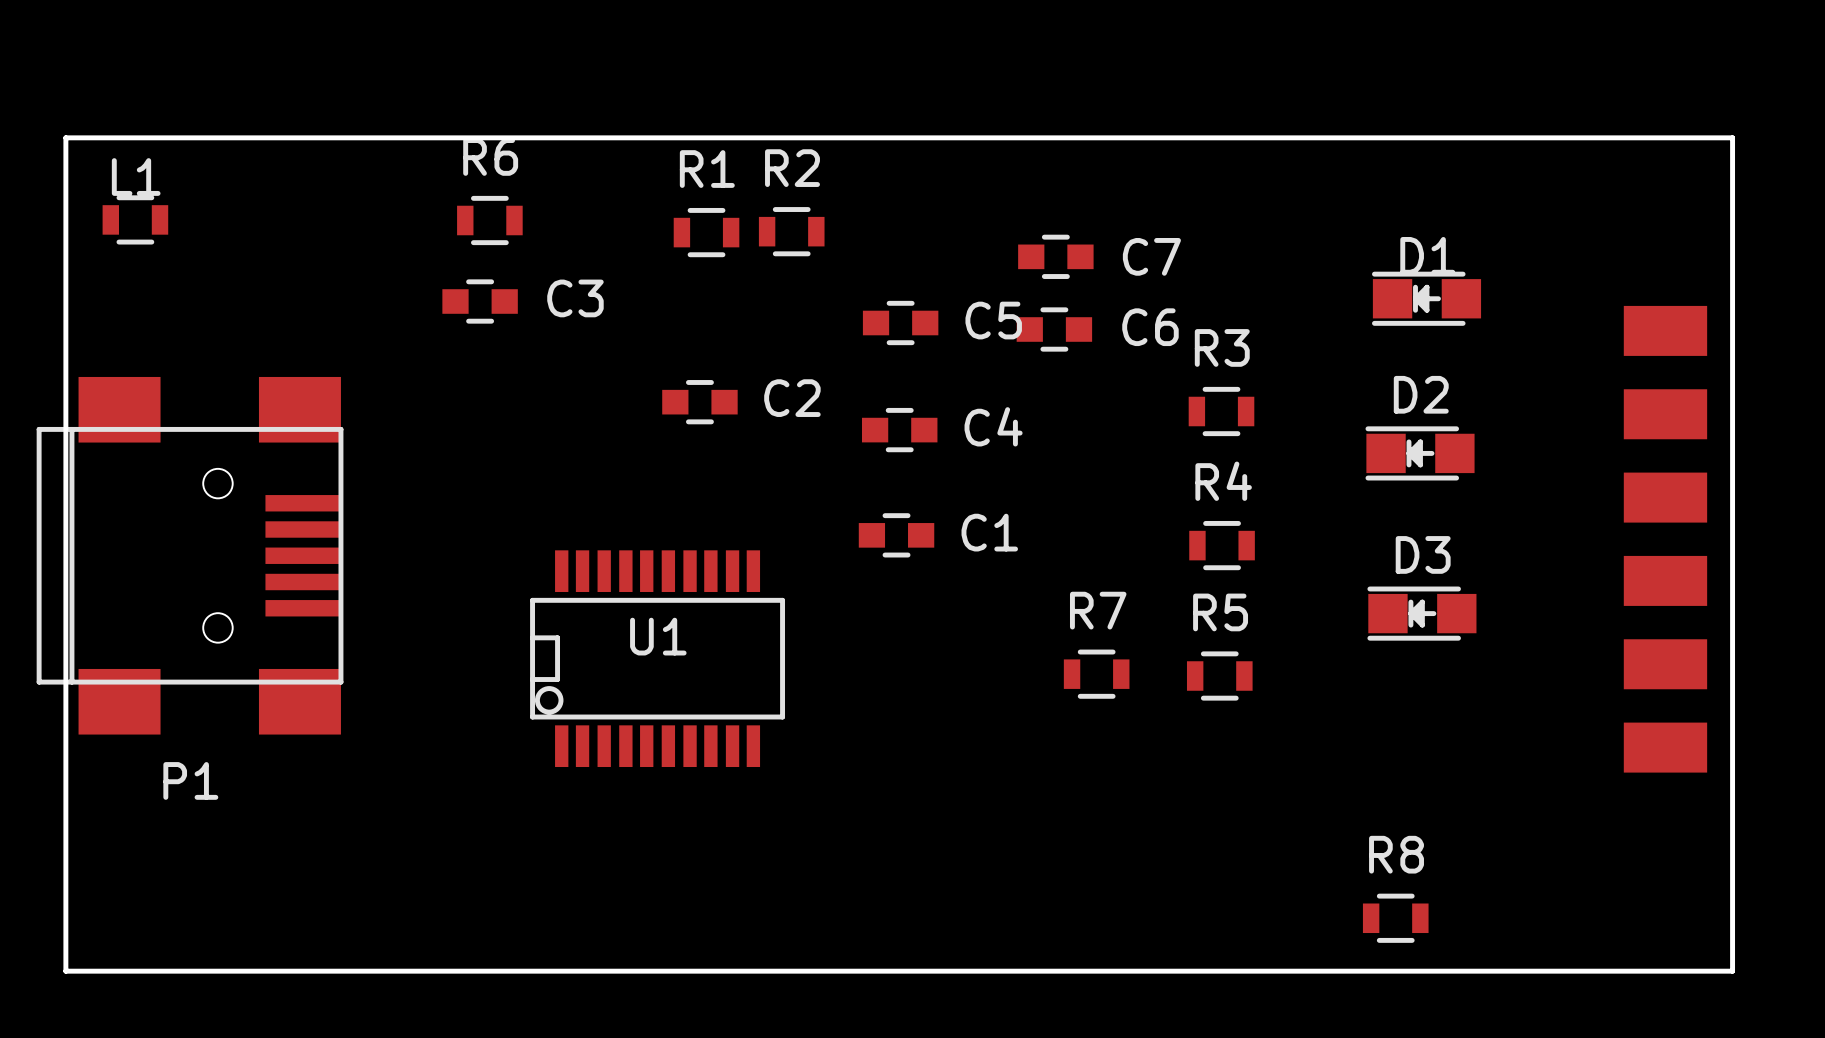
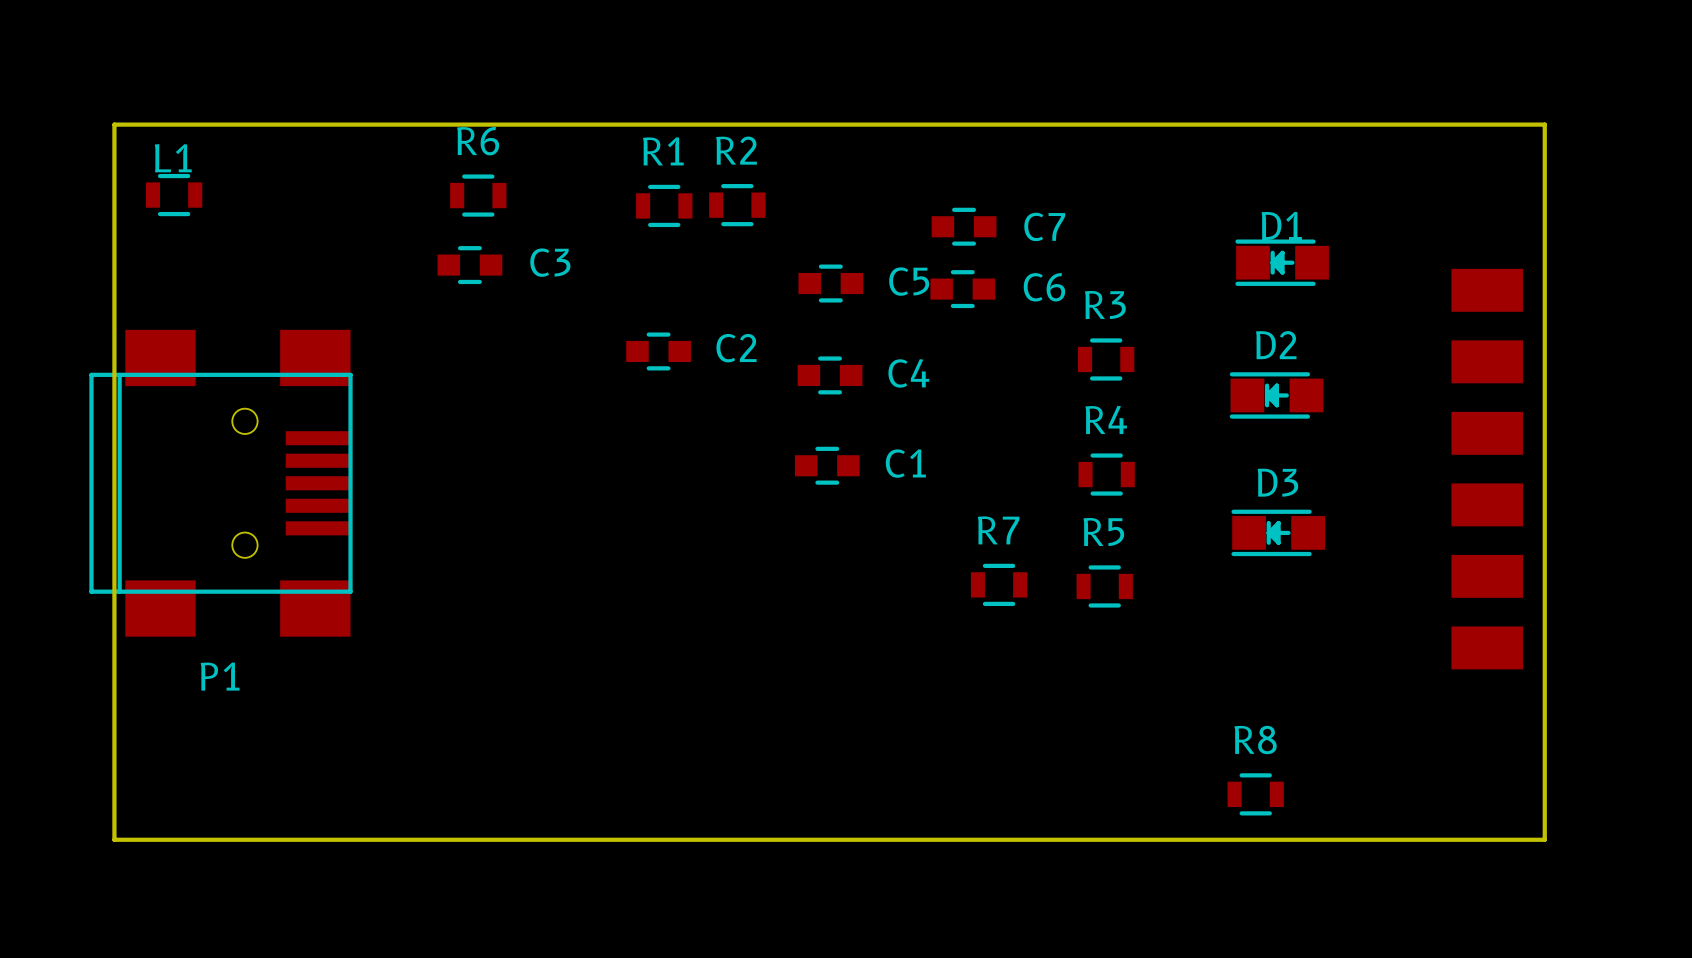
U1: (657, 658) -> none

